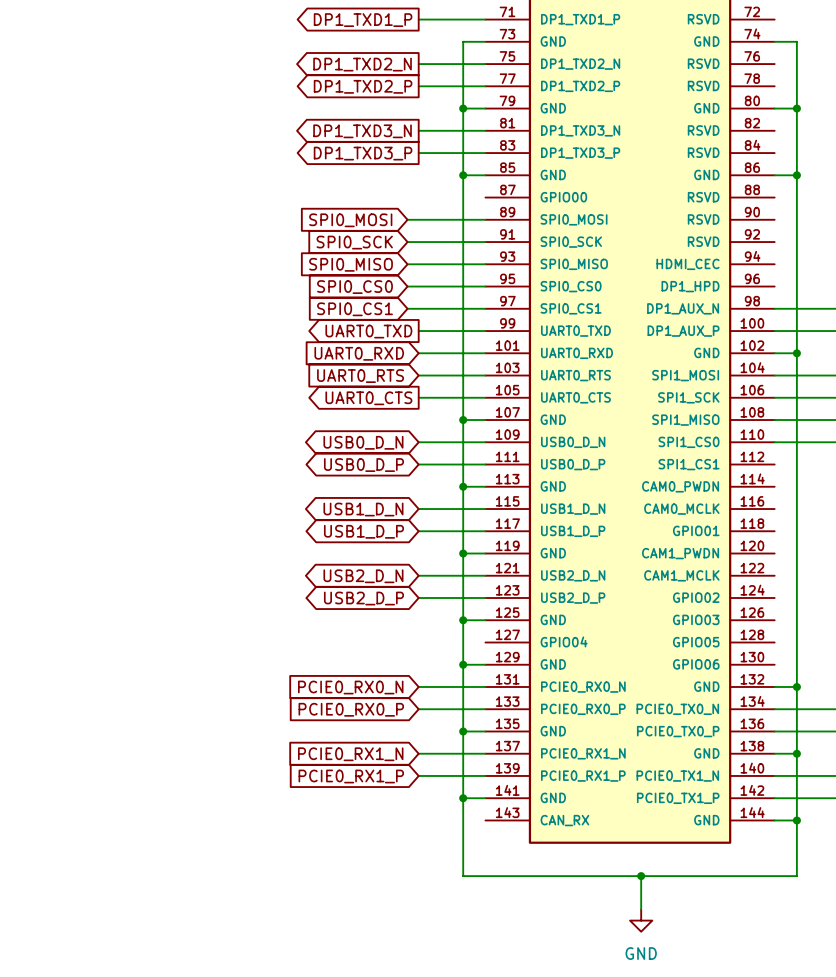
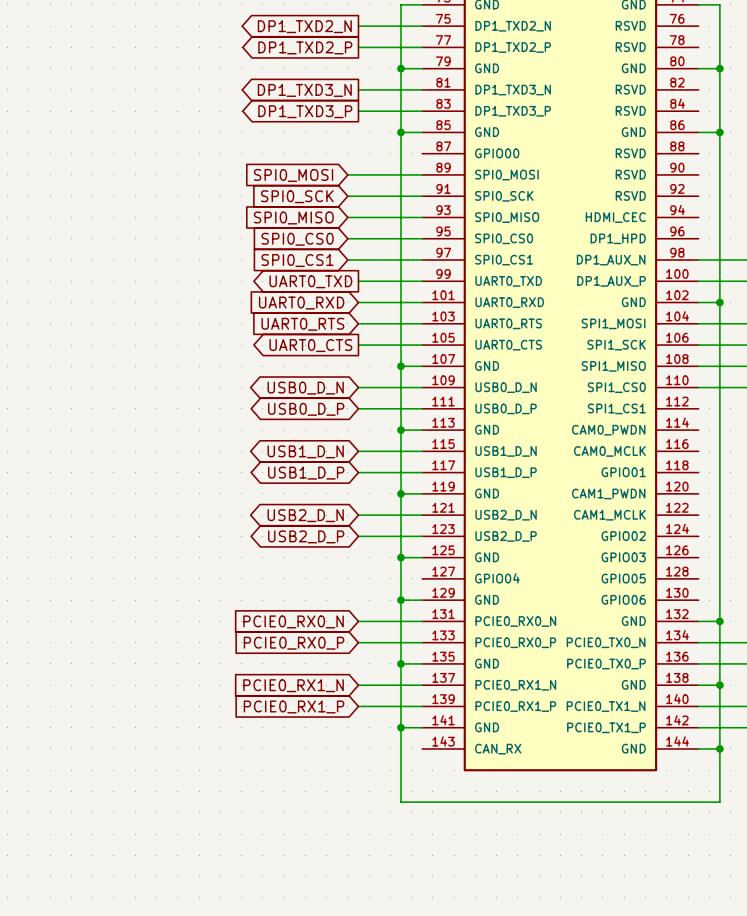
wire: (641, 876) (641, 909) -> none
junction: (641, 876) -> none
power symbol: GND (641, 920) -> none

